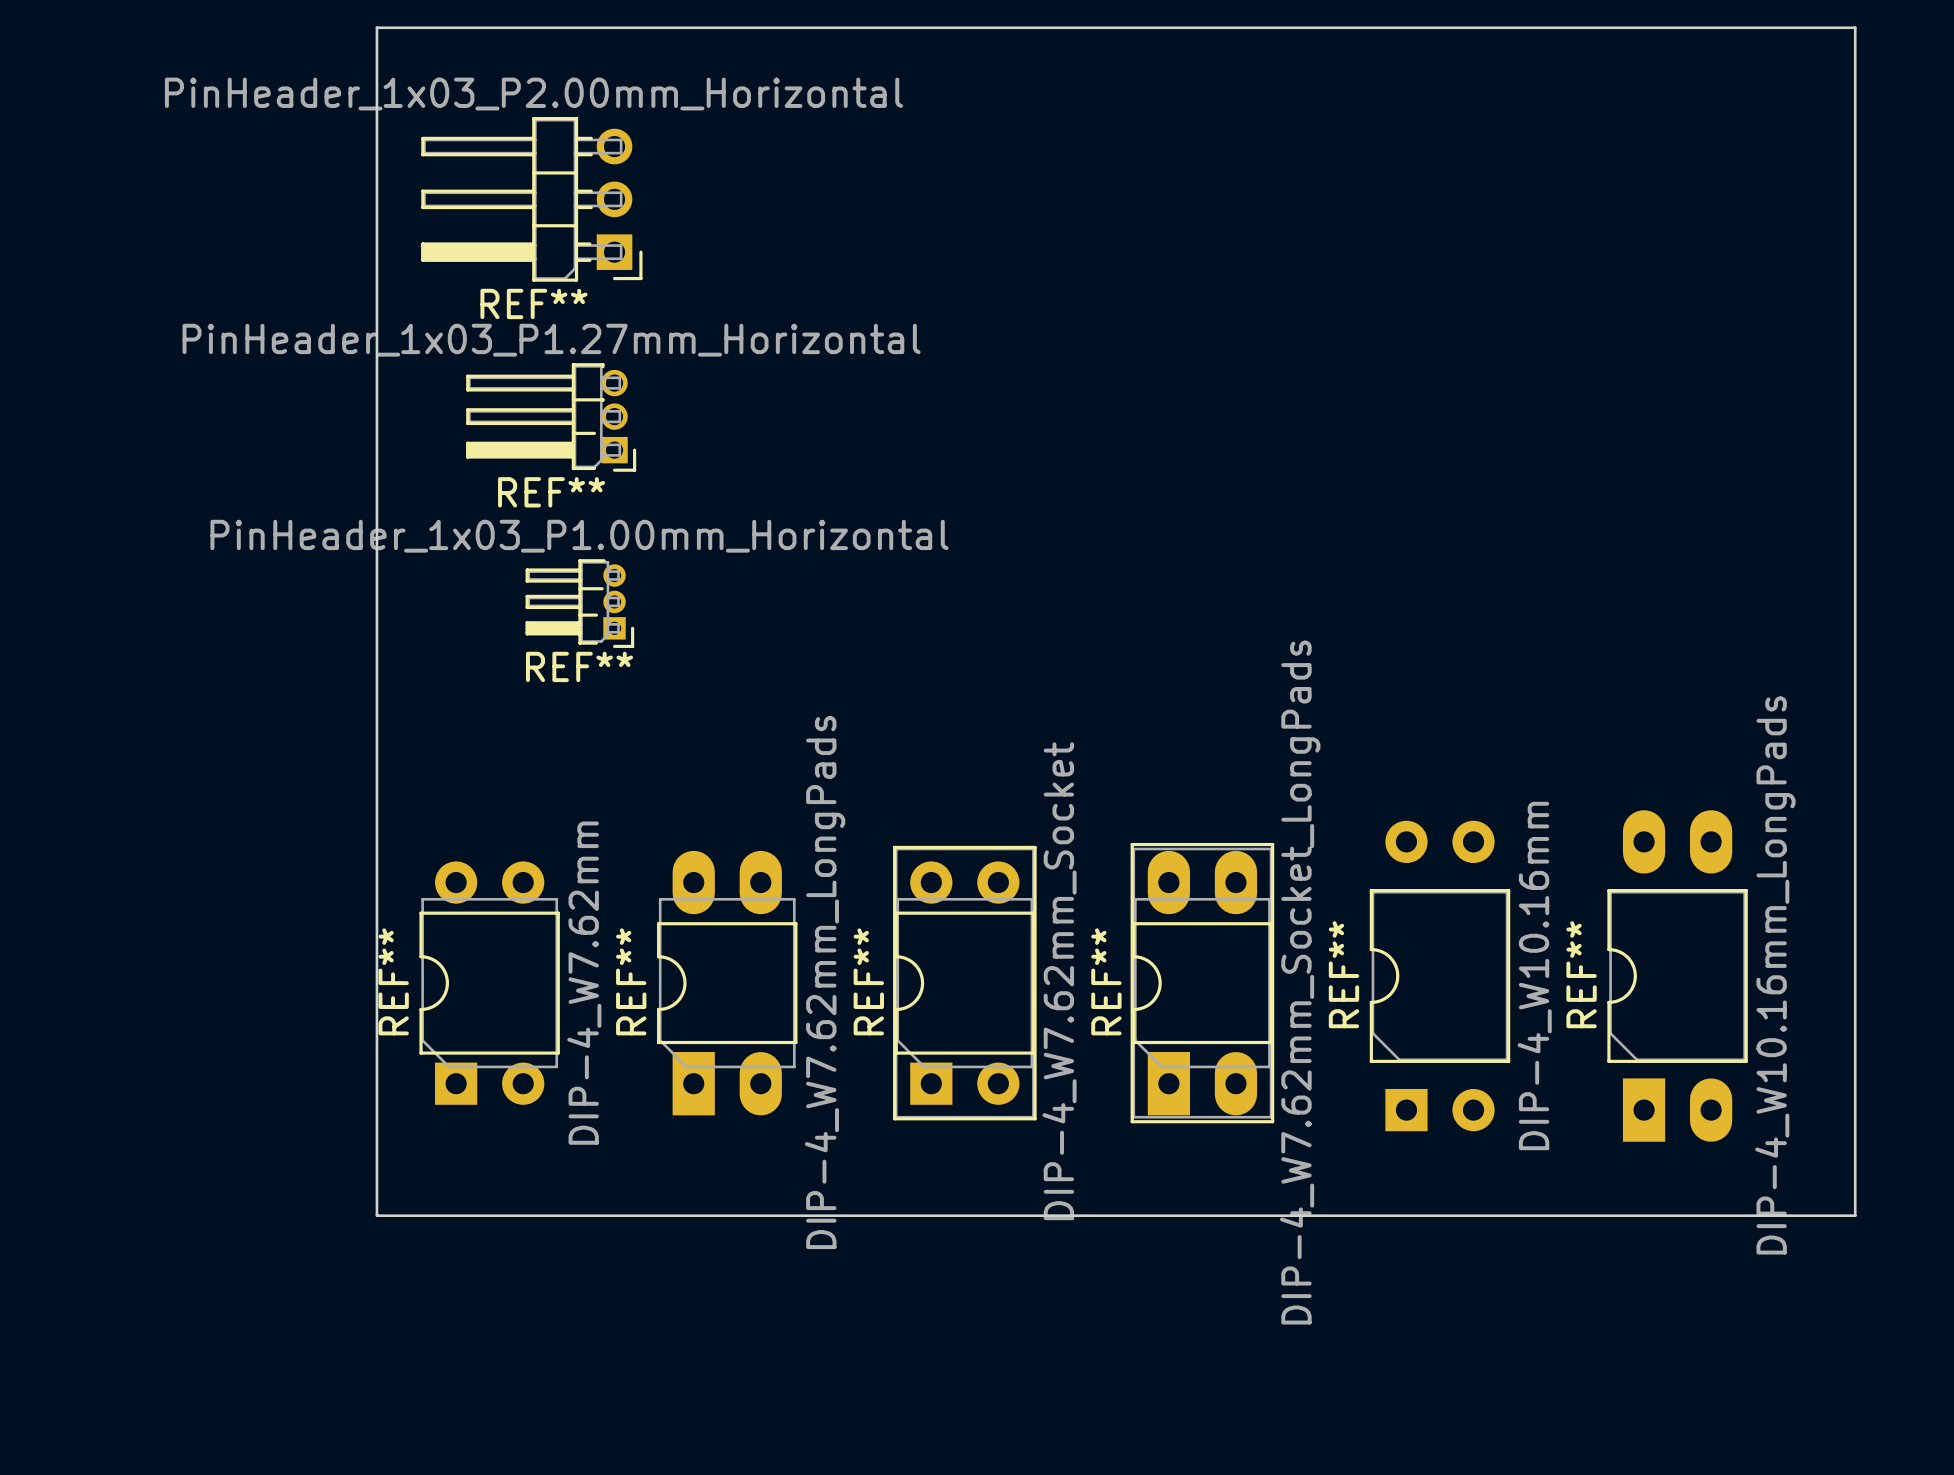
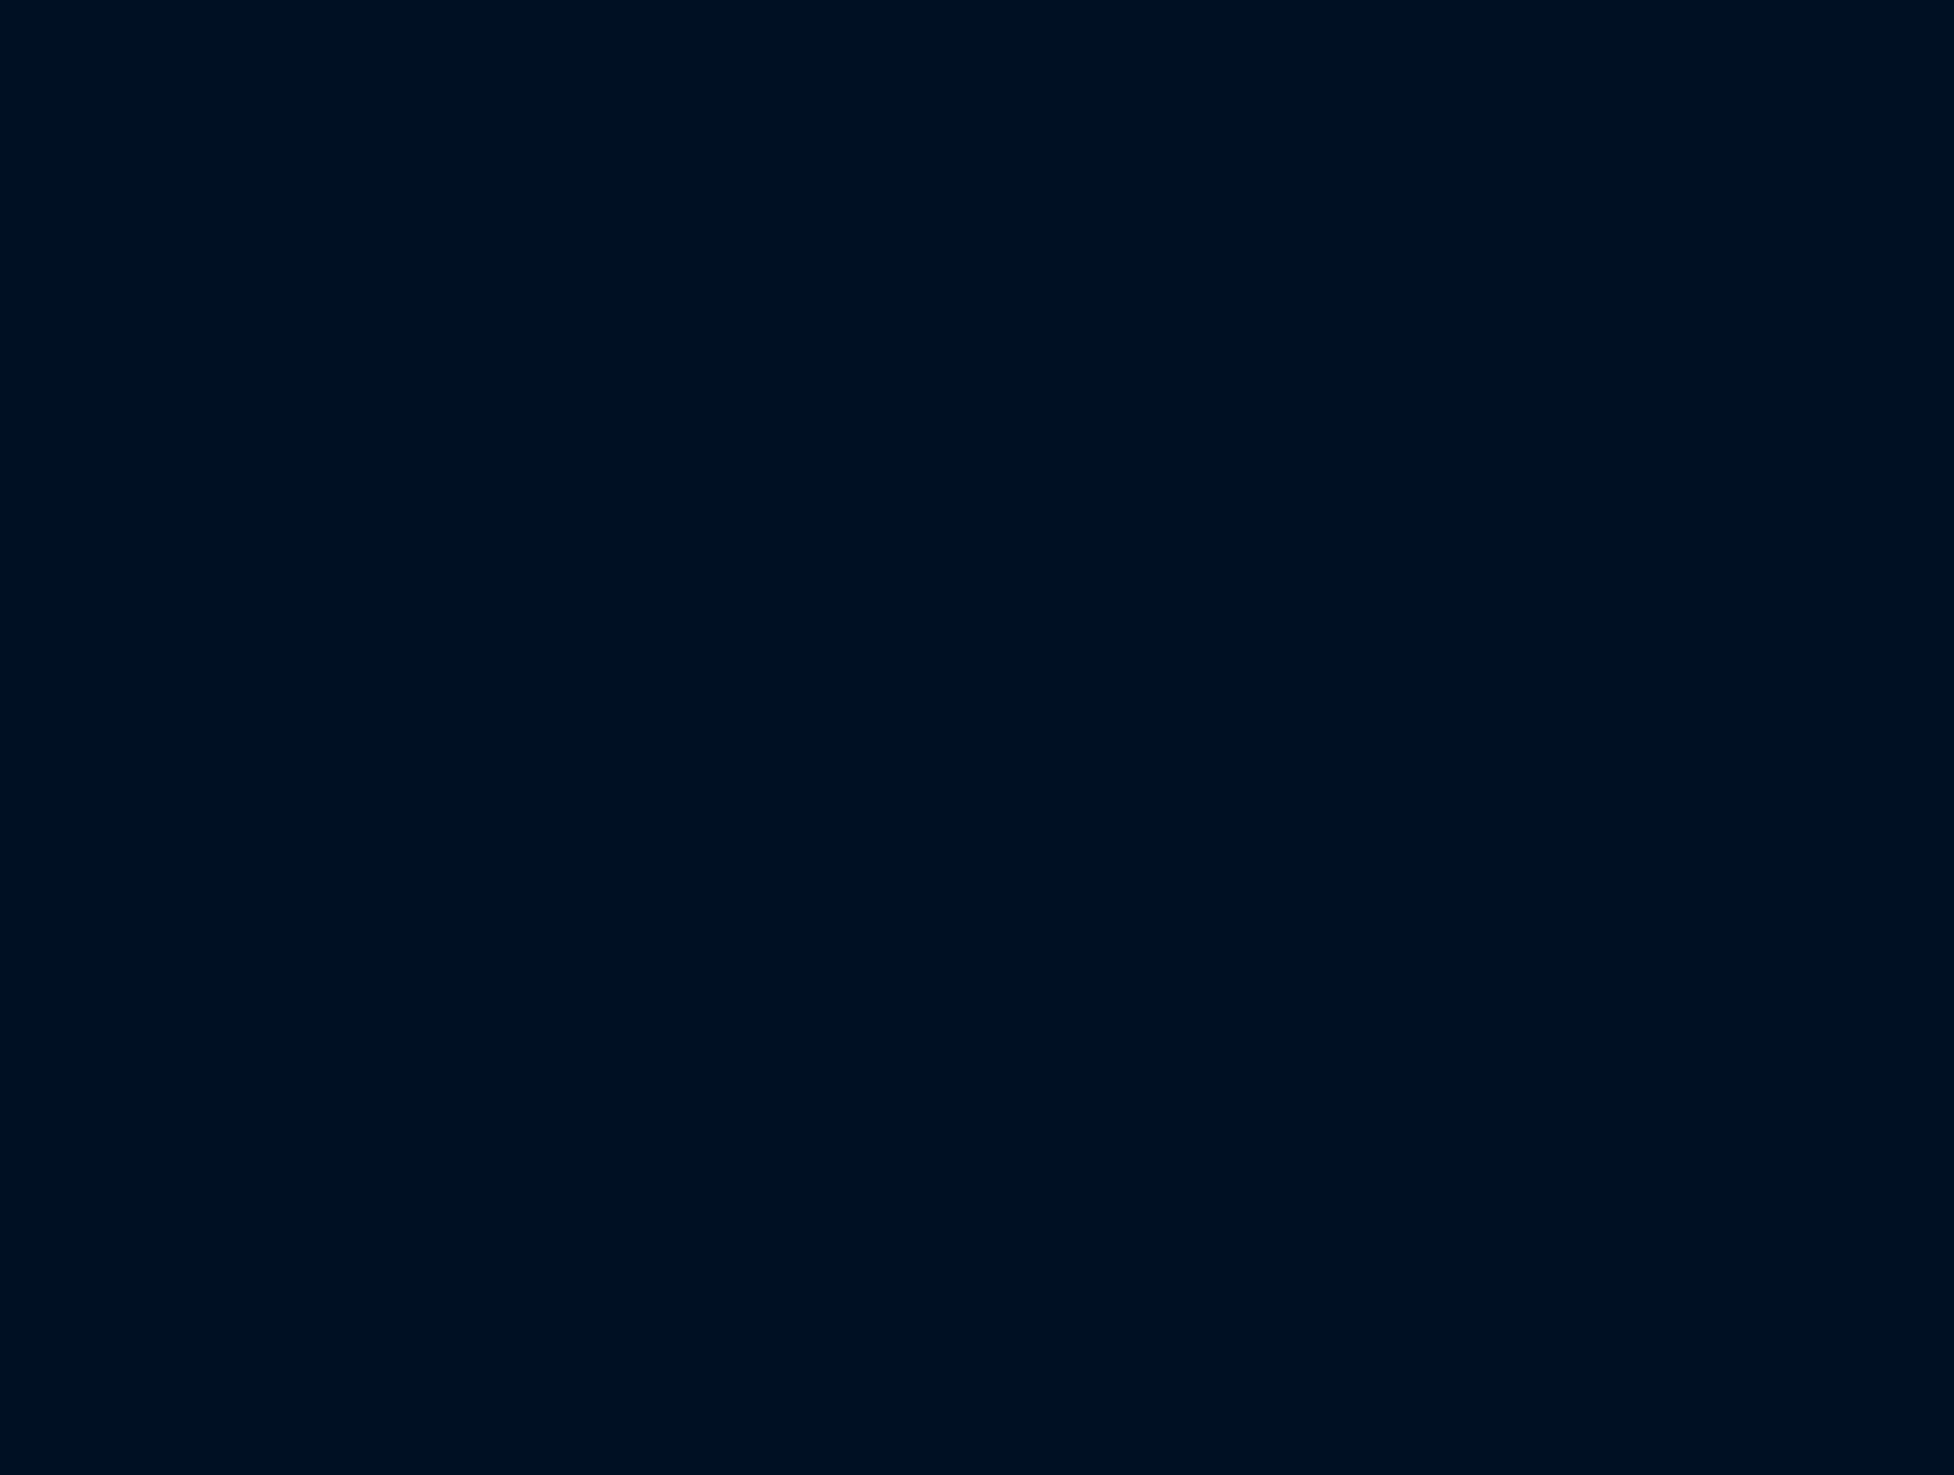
board edge: (376, 27) (376, 1215) (1855, 1215) (1855, 27) (376, 27) -> none
REF**: PinHeader_1x03_P2.00mm_Horizontal (531, 199) -> none
REF**: PinHeader_1x03_P1.27mm_Horizontal (551, 417) -> none
REF**: PinHeader_1x03_P1.00mm_Horizontal (579, 603) -> none
REF**: DIP-4_W10.16mm (1440, 975) -> none
REF**: DIP-4_W10.16mm_LongPads (1677, 975) -> none
REF**: DIP-4_W7.62mm (489, 983) -> none
REF**: DIP-4_W7.62mm_LongPads (727, 983) -> none
REF**: DIP-4_W7.62mm_Socket (964, 983) -> none
REF**: DIP-4_W7.62mm_Socket_LongPads (1202, 983) -> none

